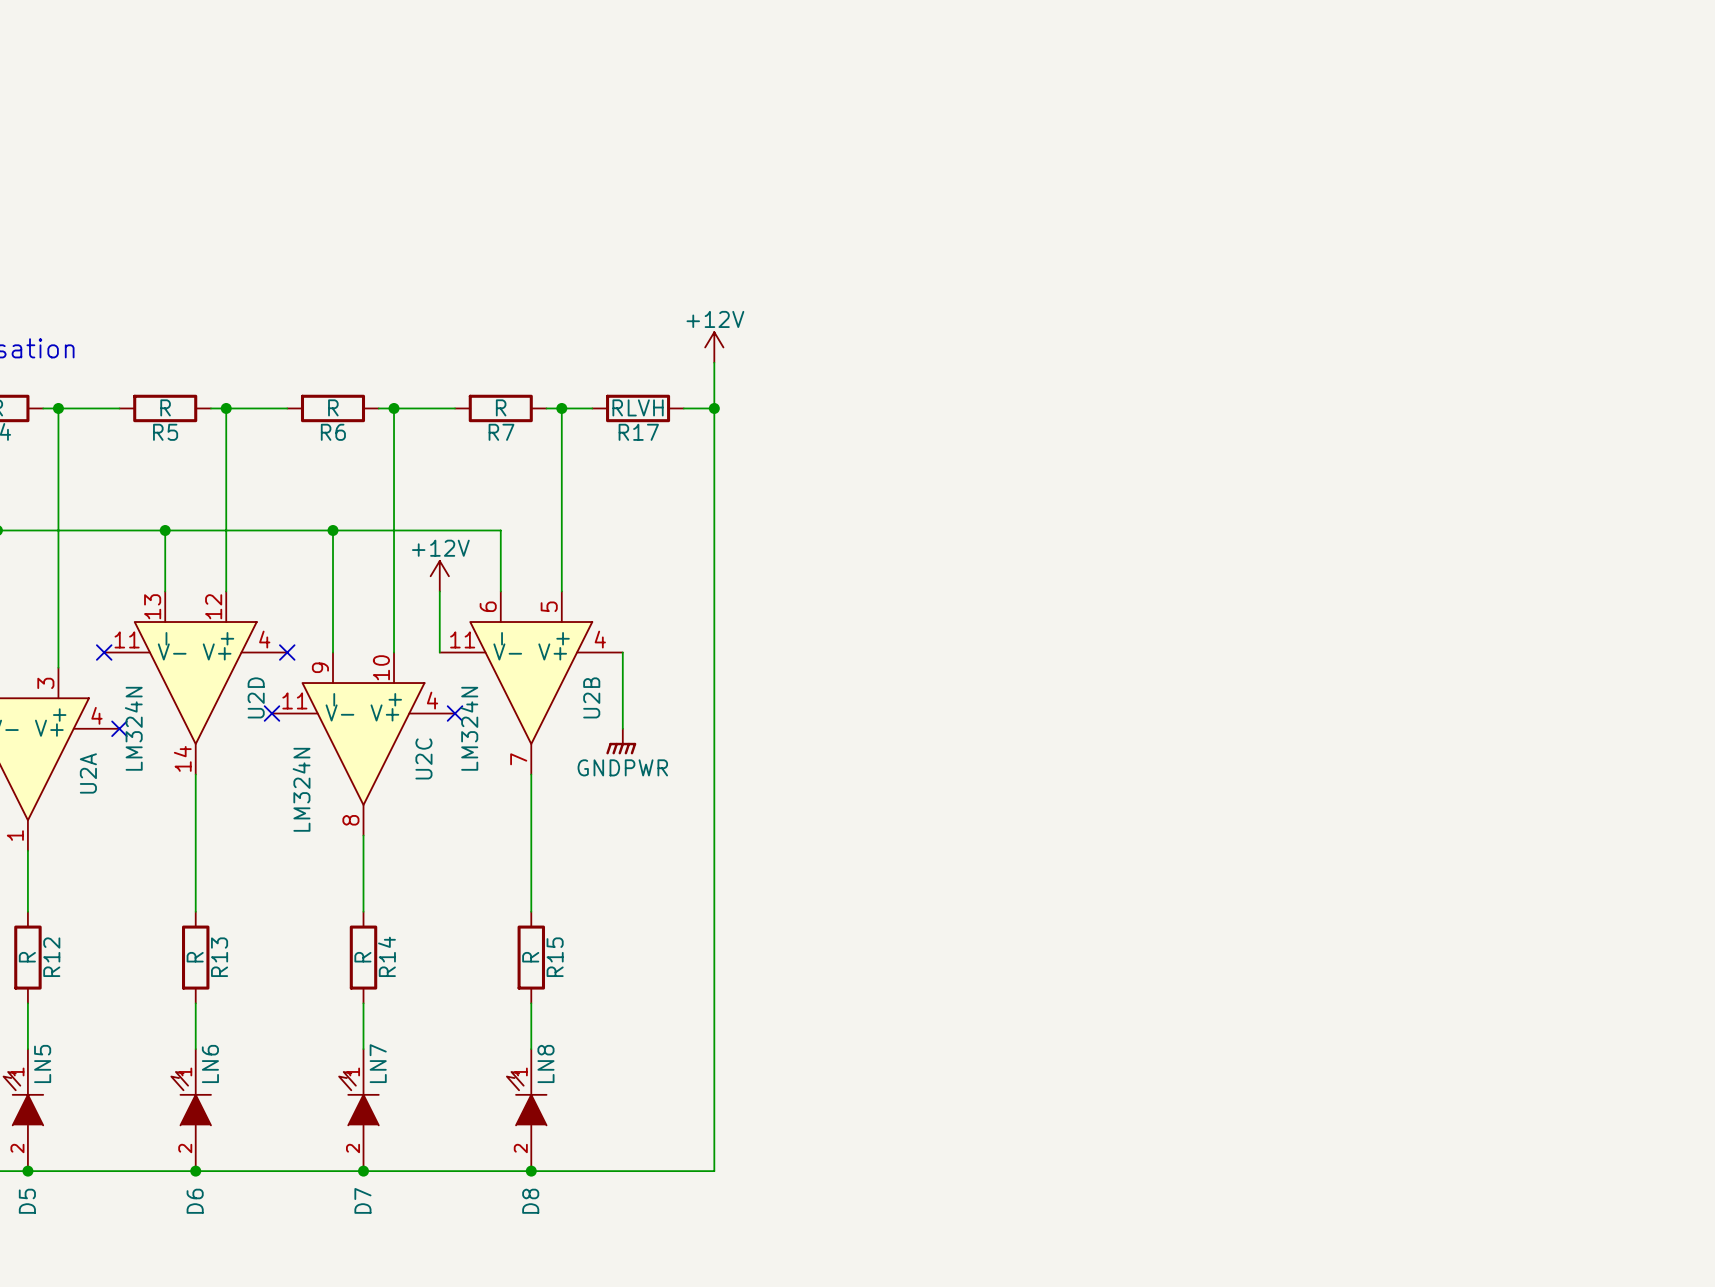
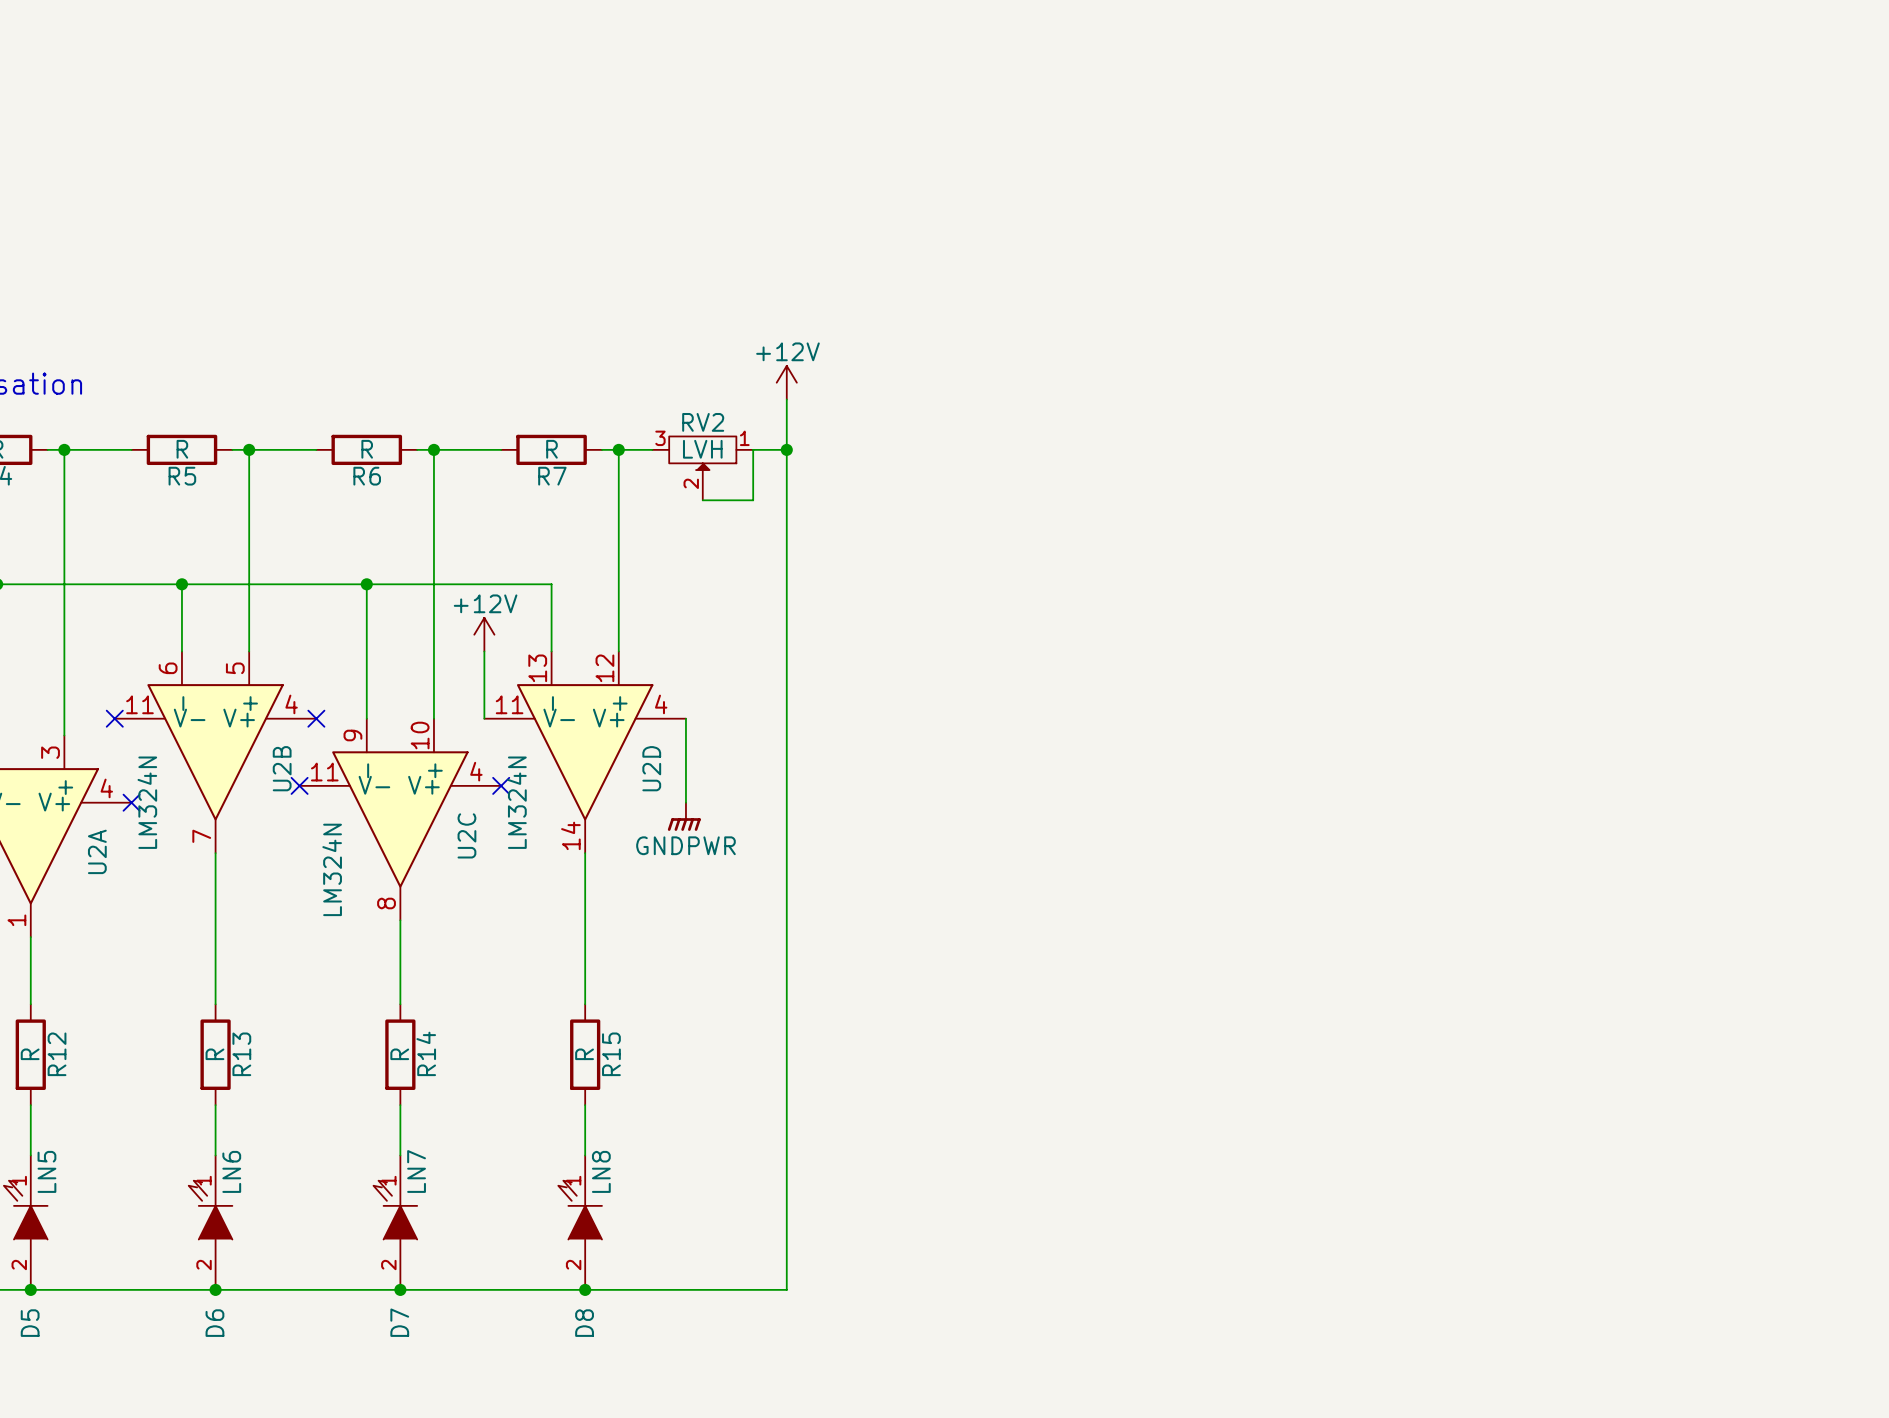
R17: RLVH (638, 408) -> none
wire: none -> (753, 449) (753, 500) (702, 500)
RV2: none -> LVH (702, 468)
U2D position: (195, 683) -> (585, 752)
U2B position: (531, 683) -> (215, 752)

